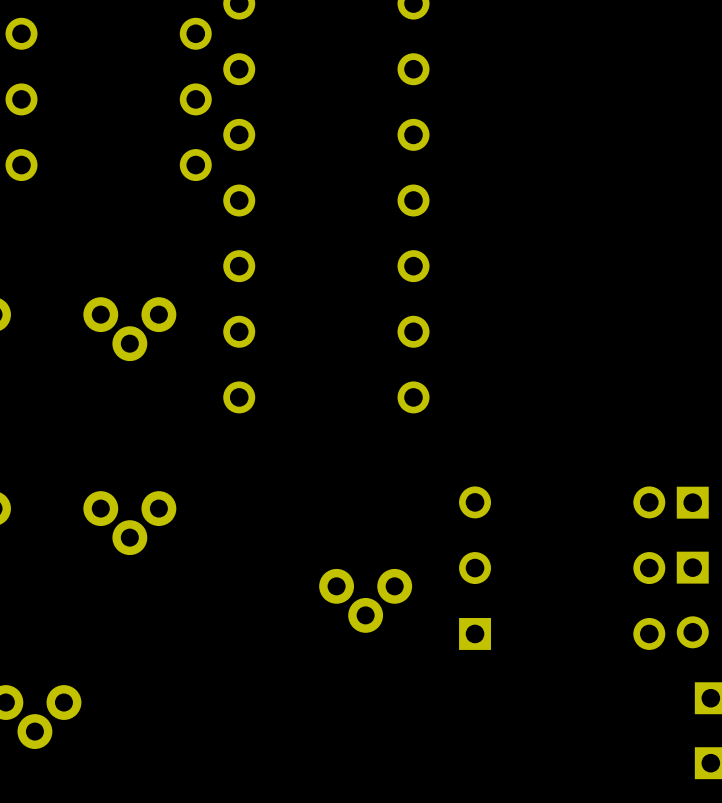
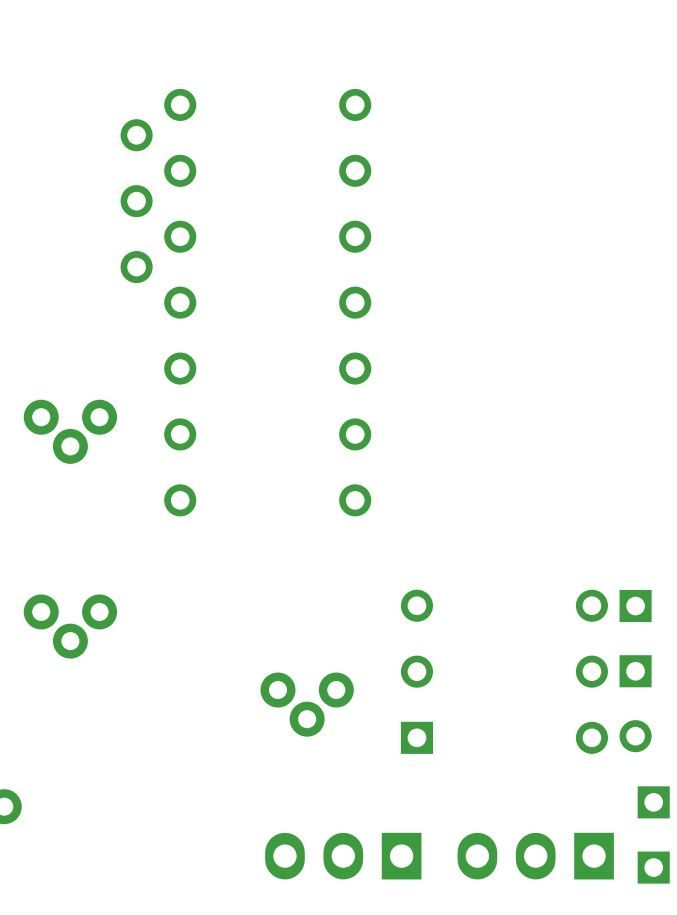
part: none -> (343, 856)
part: none -> (535, 856)

